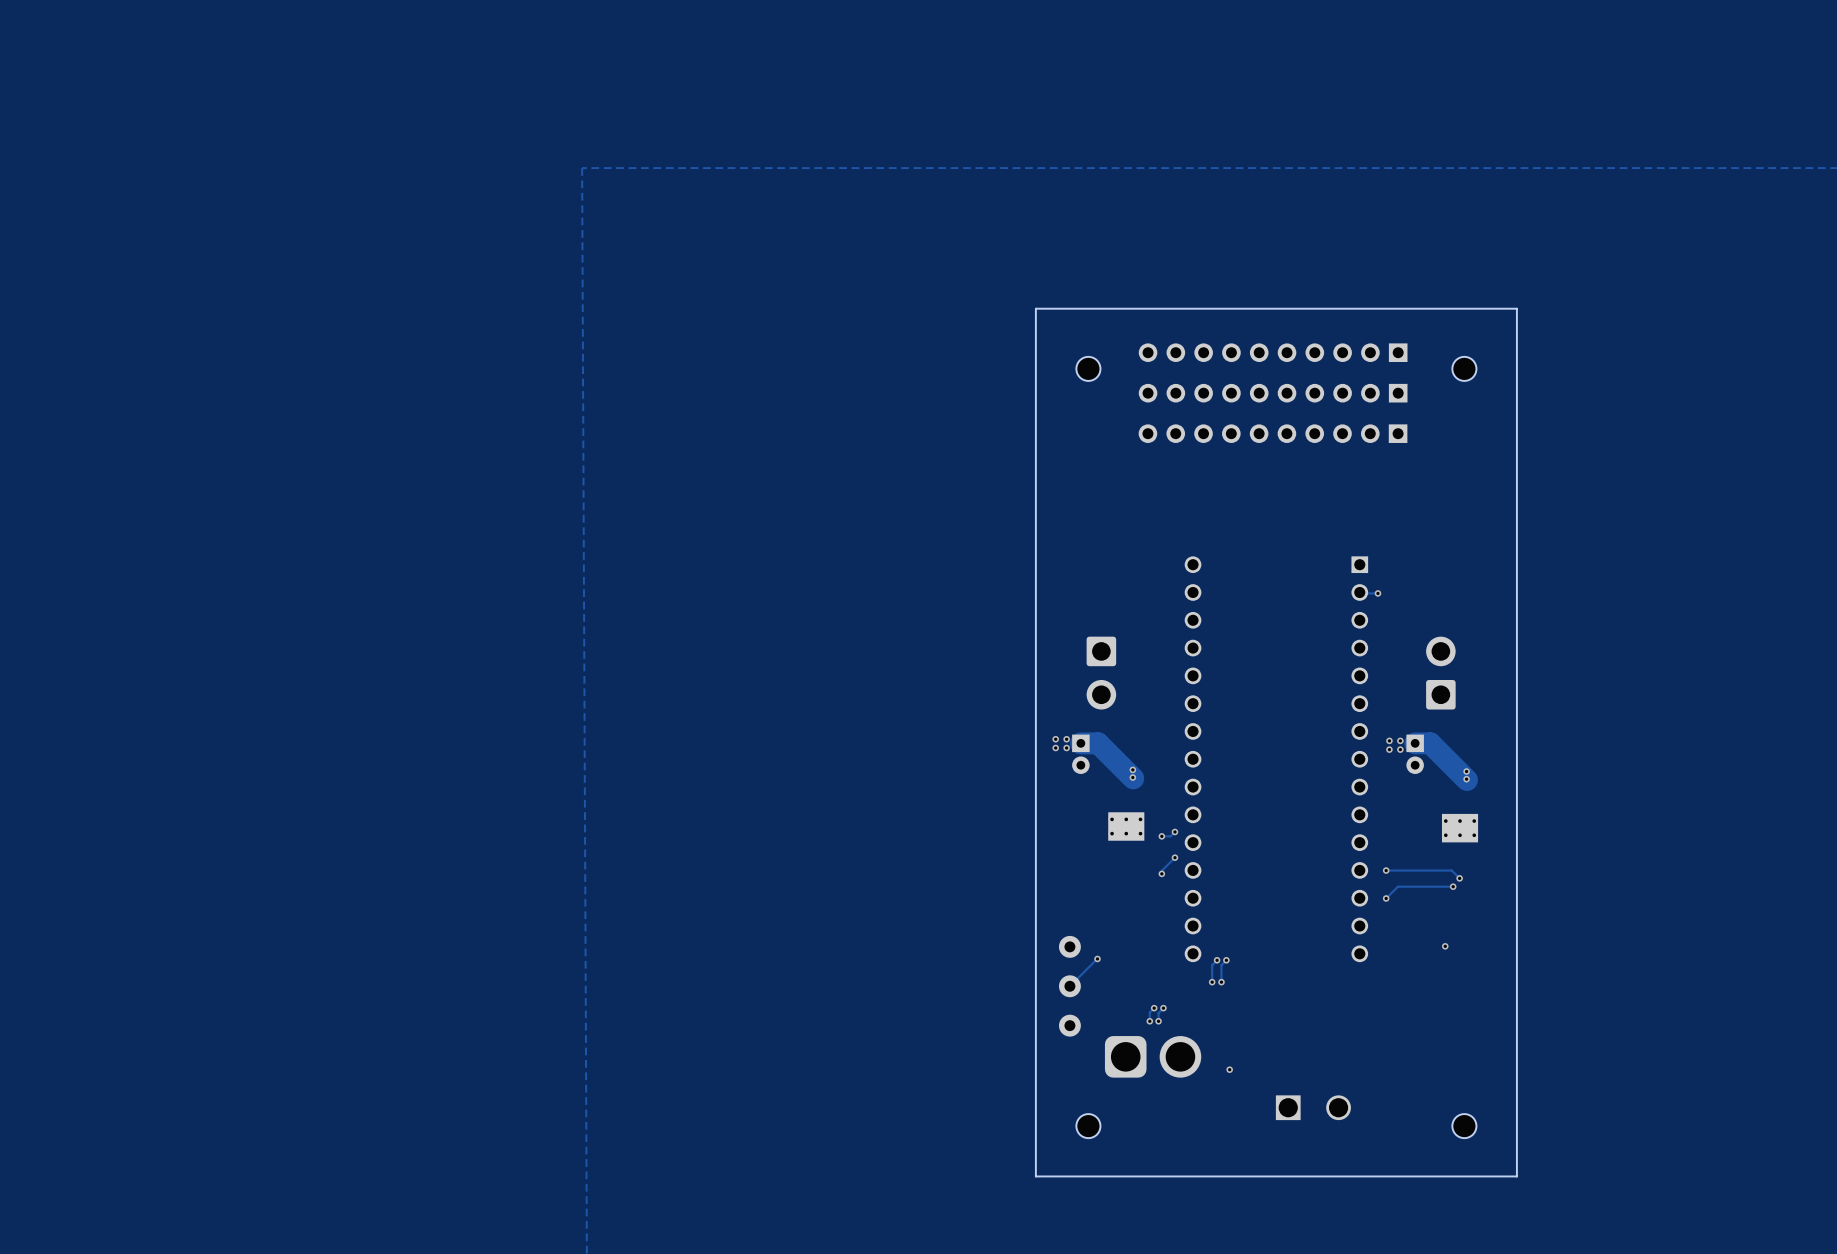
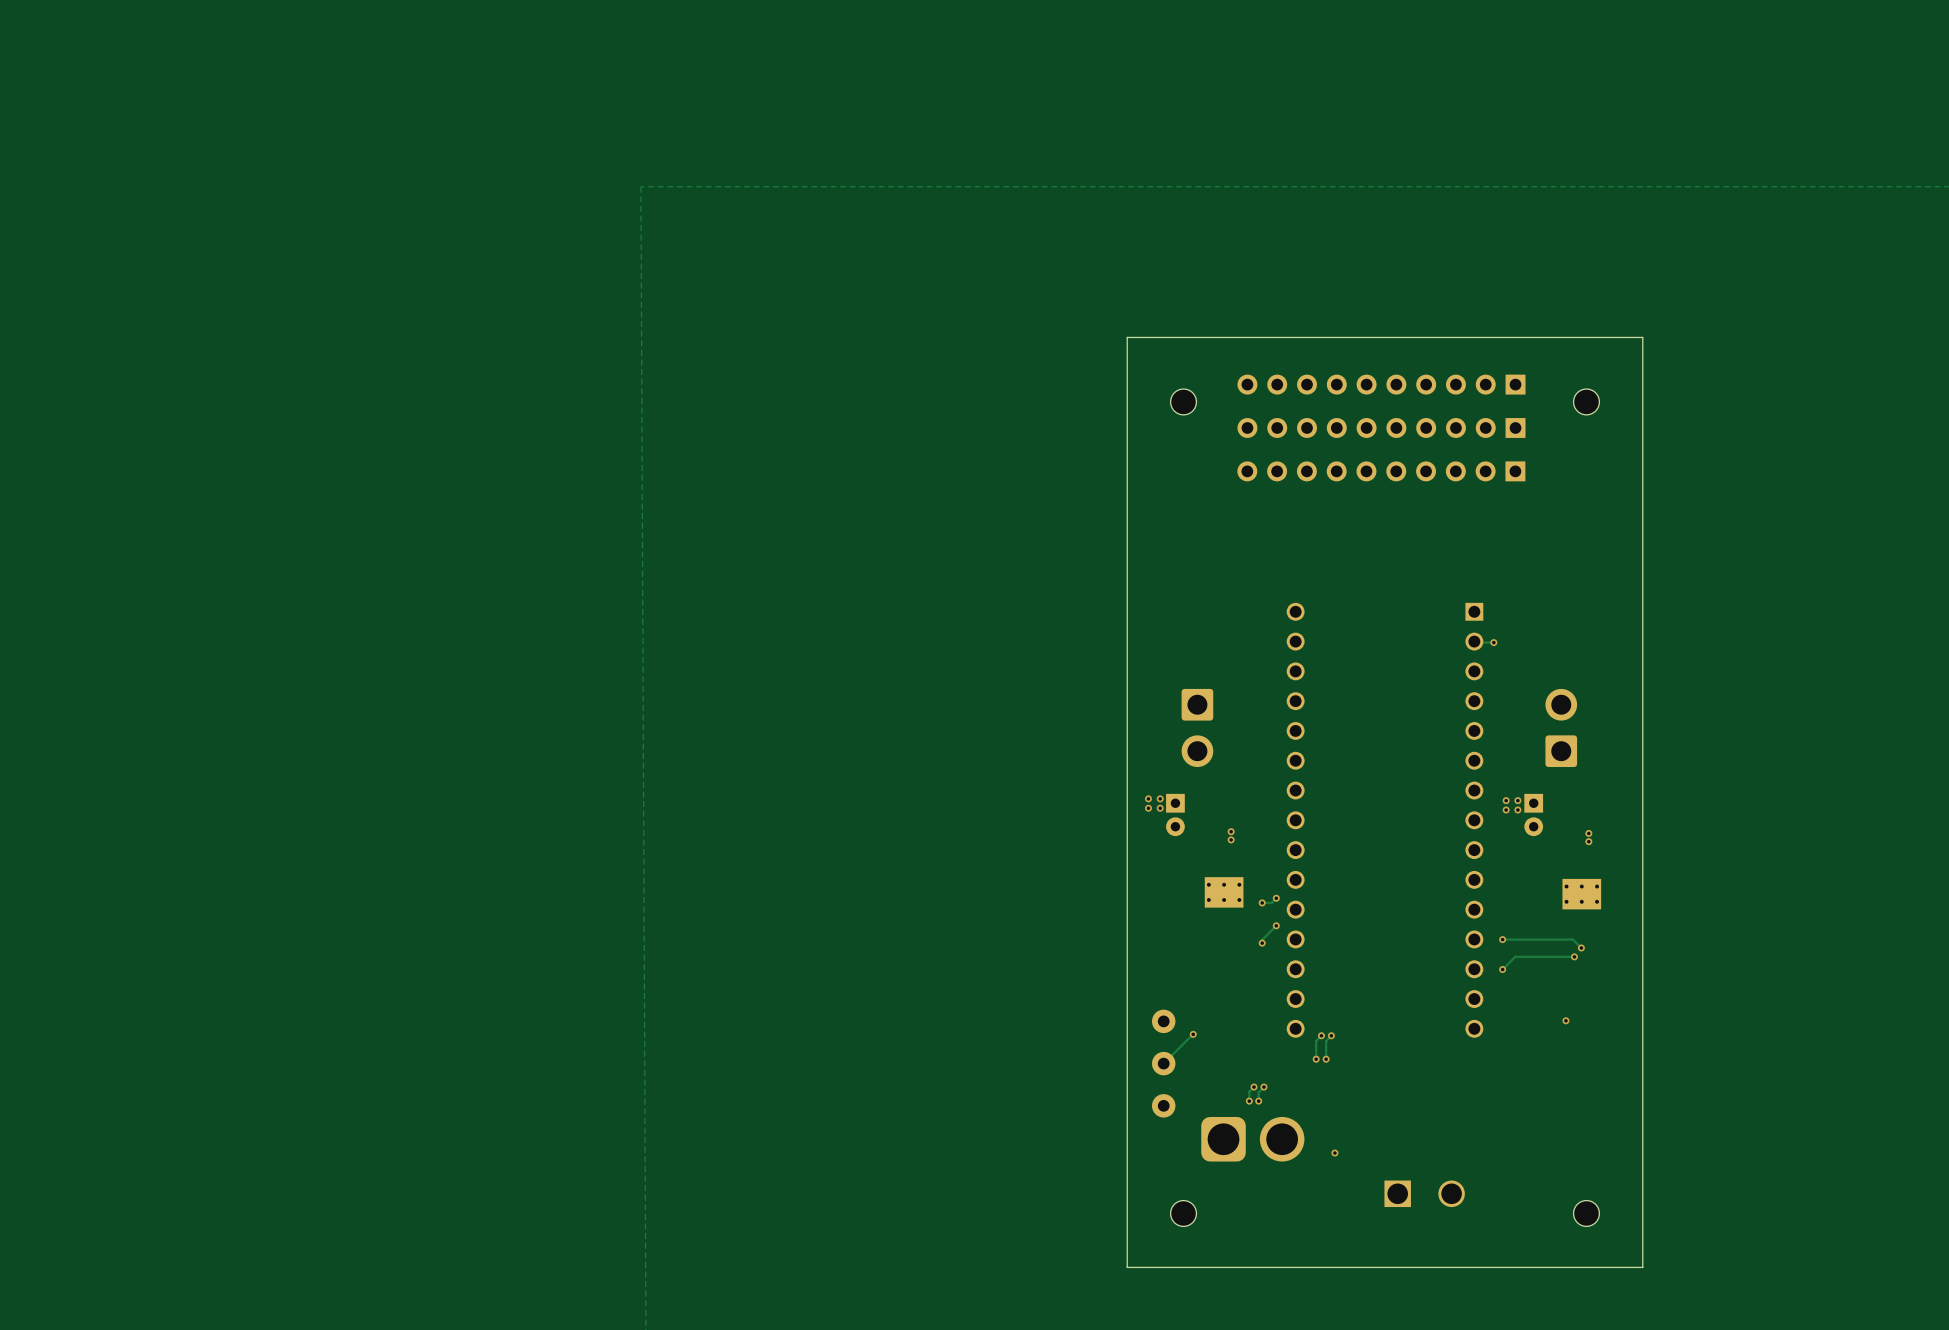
track: (1080, 743) (1098, 743) (1133, 778) -> none
track: (1415, 743) (1430, 743) (1467, 780) -> none

